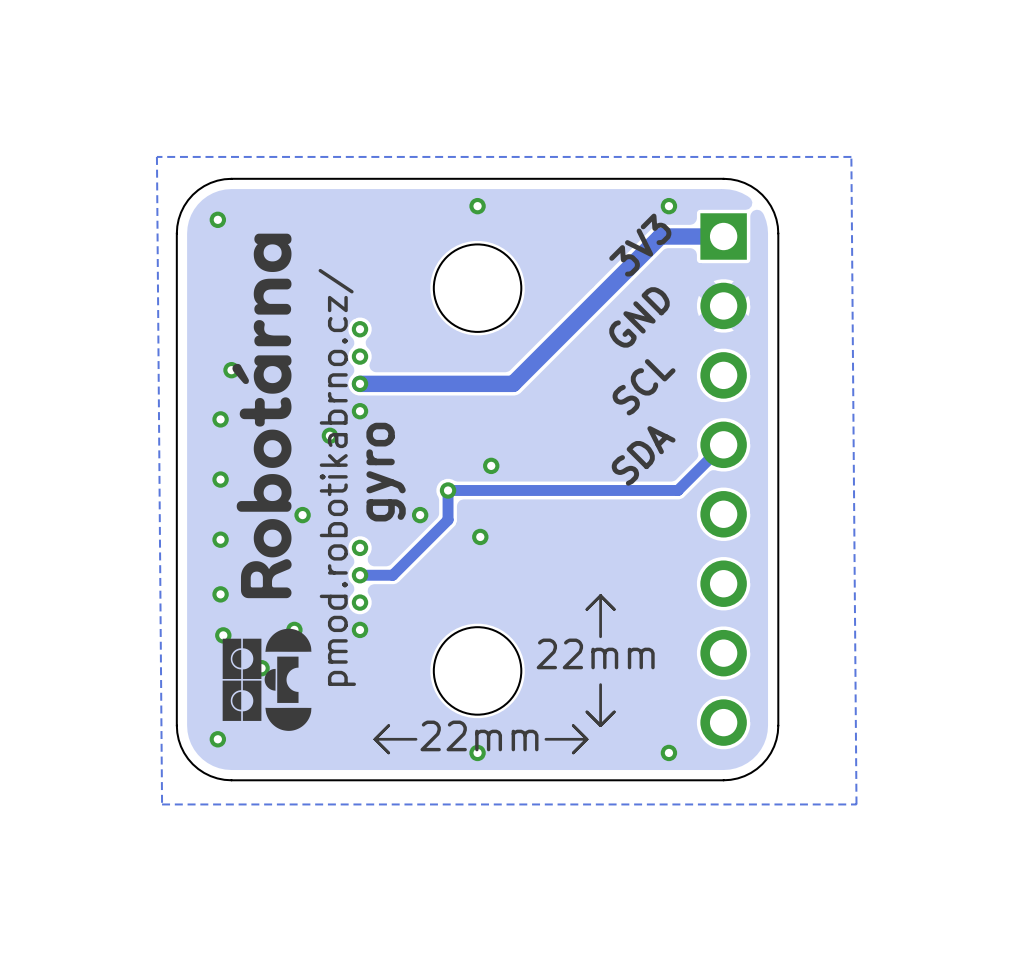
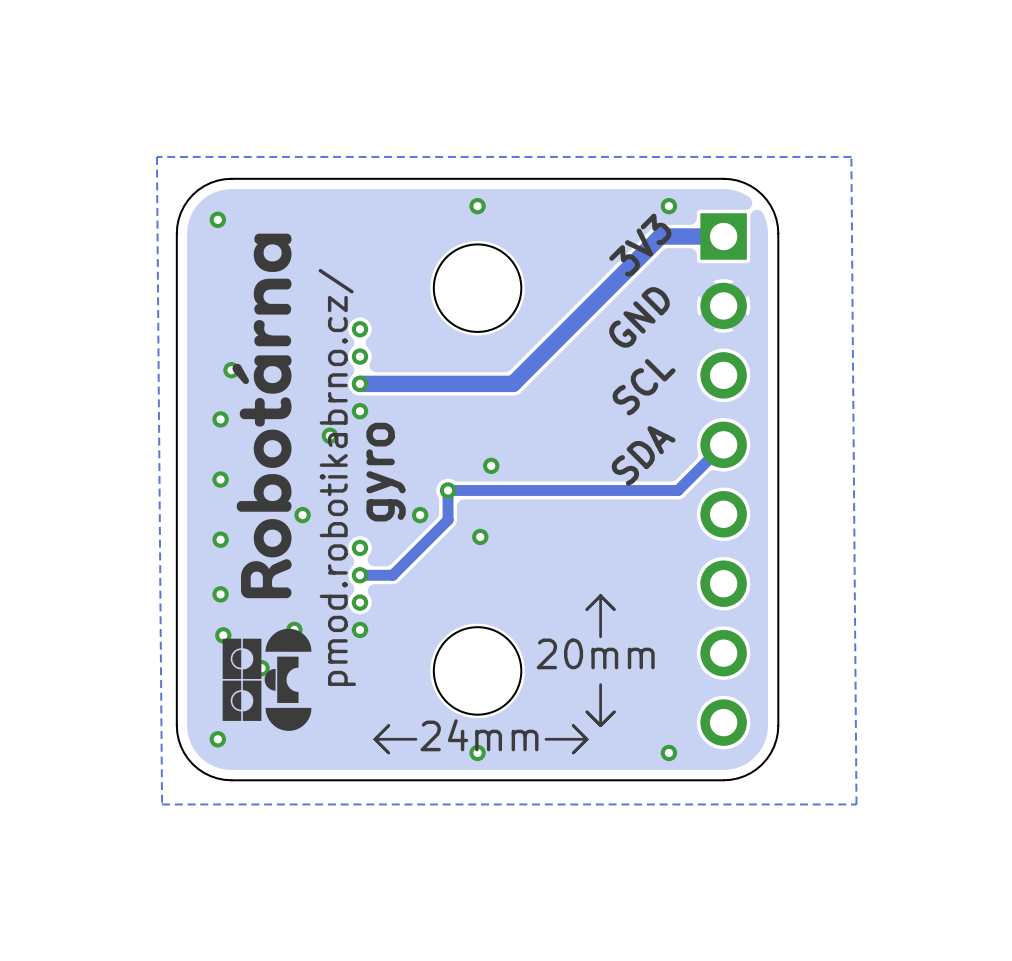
text: 22mm (595, 653) -> 20mm (595, 653)
text: 22mm (479, 735) -> 24mm (479, 735)

